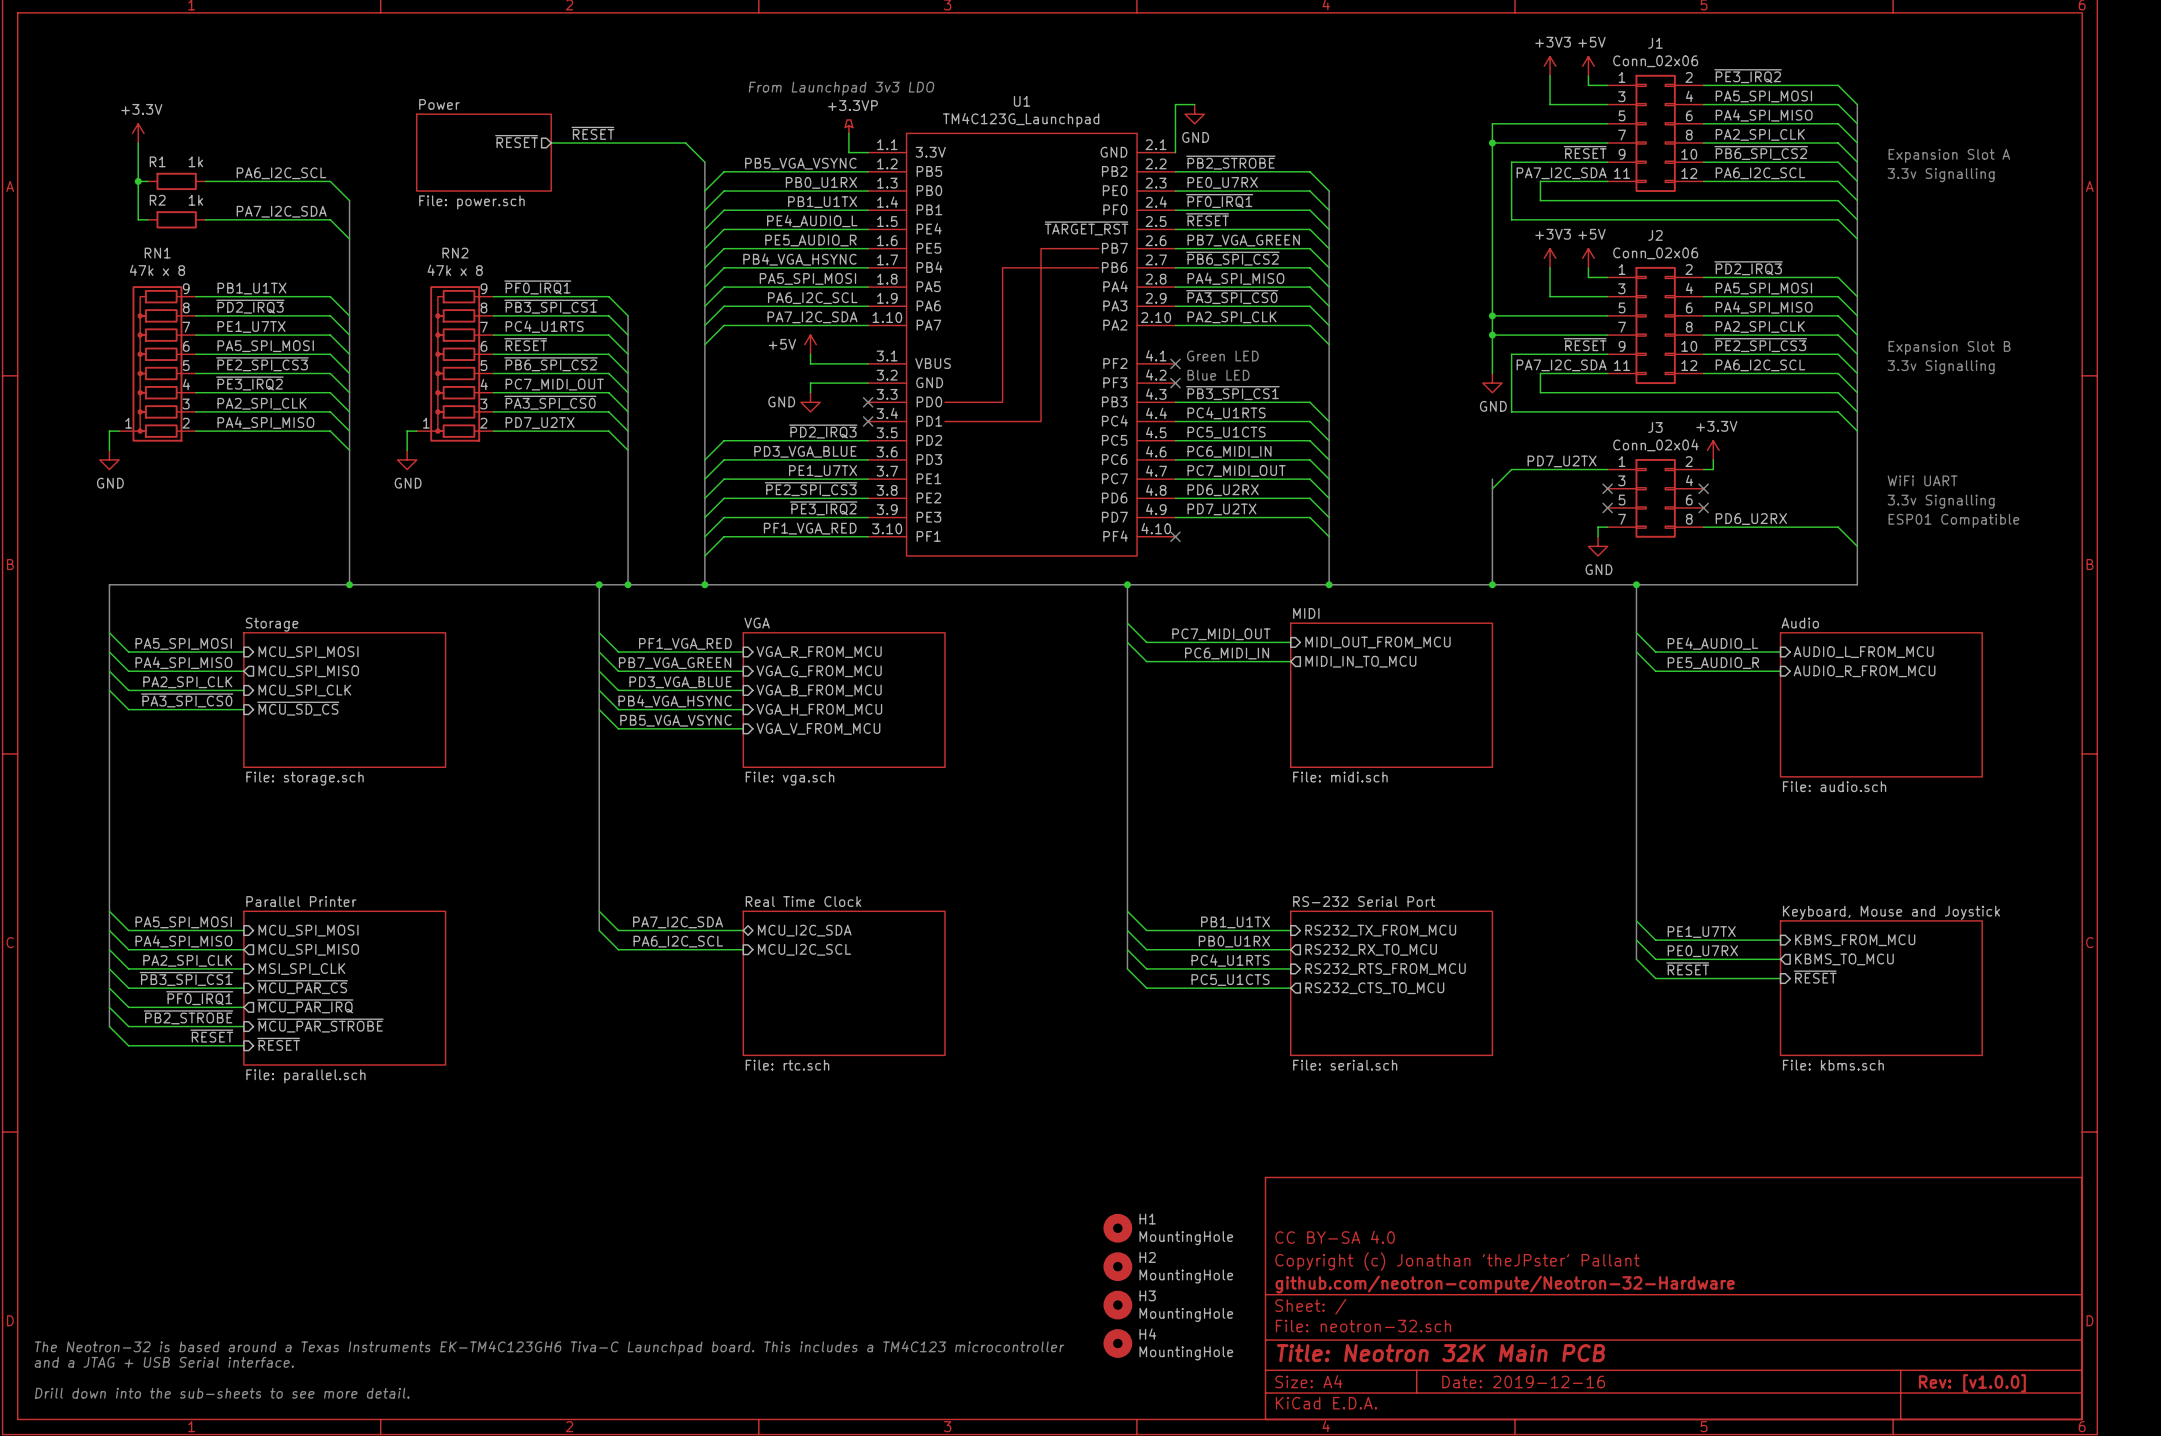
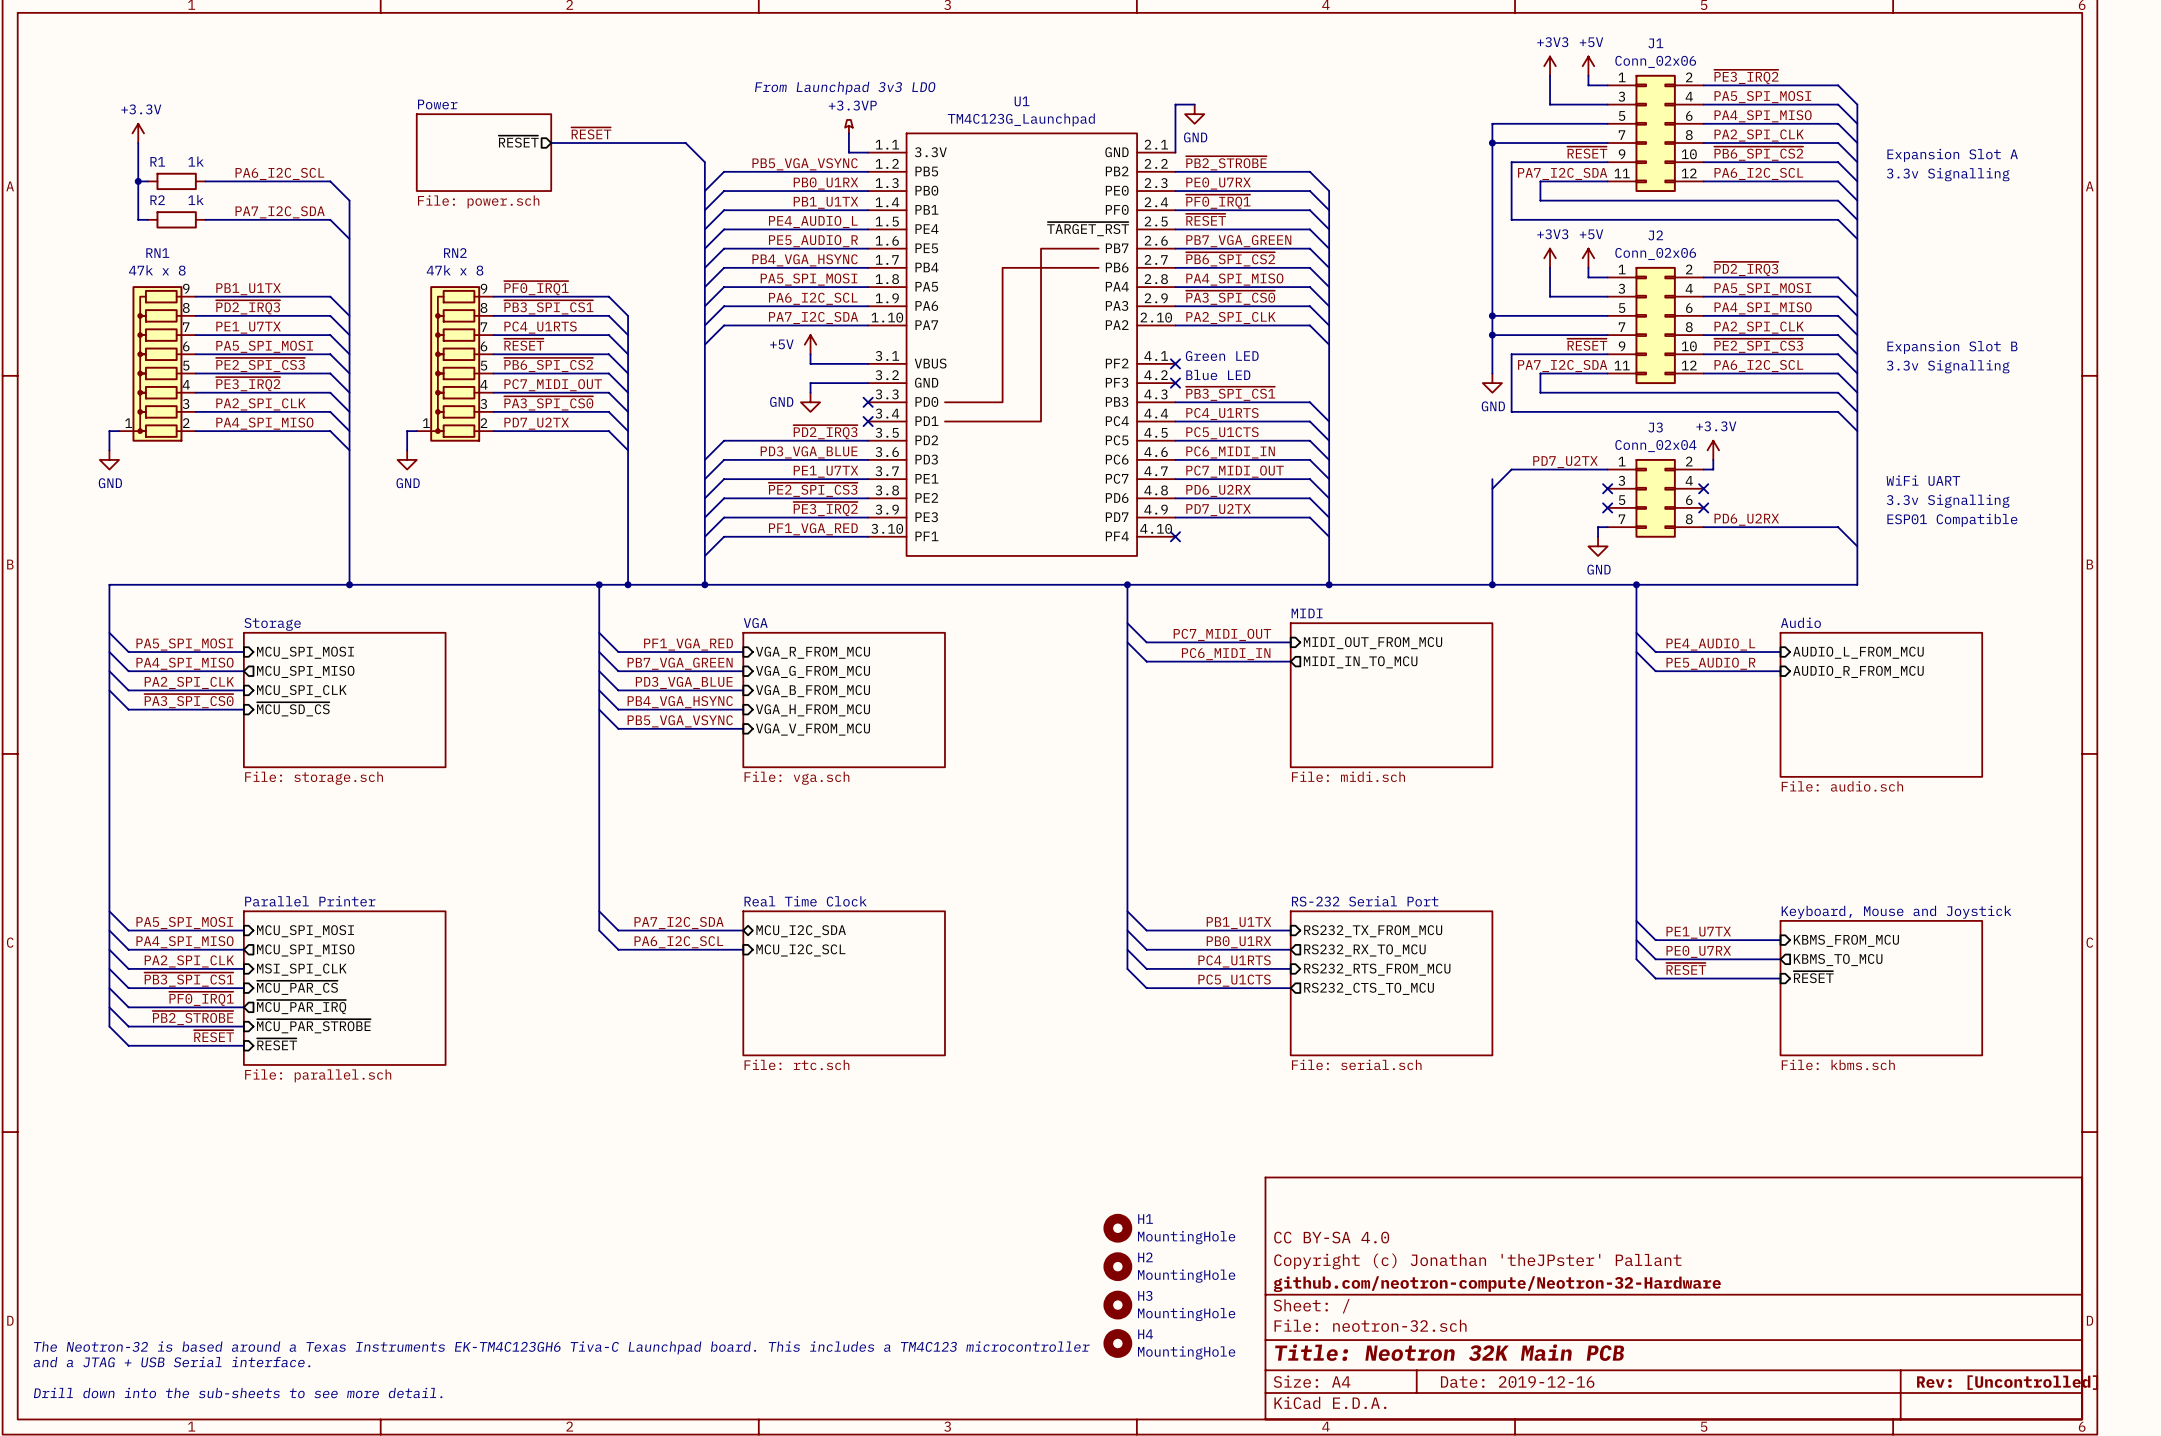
title block: Rev: [v1.0.0] (1972, 1383) -> Rev: [Uncontrolled] (2007, 1382)

